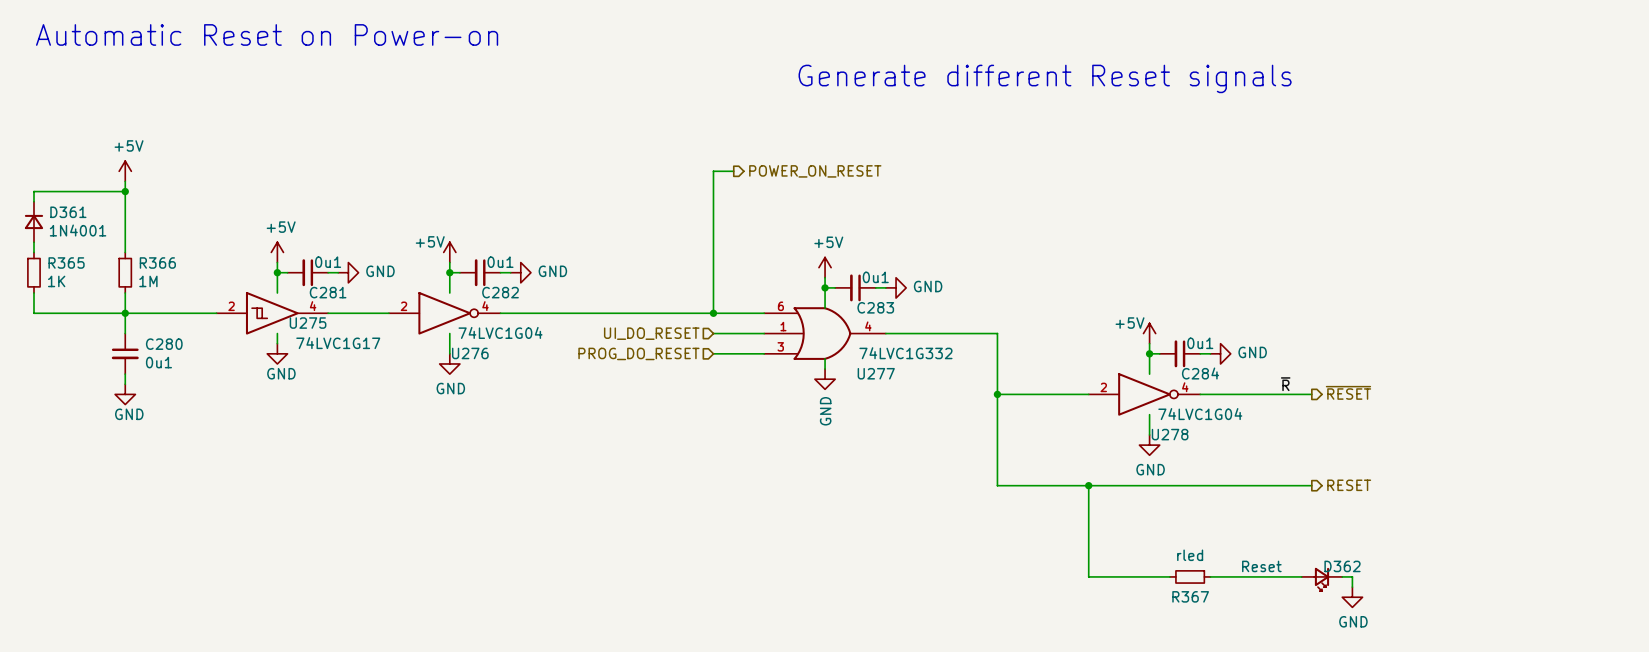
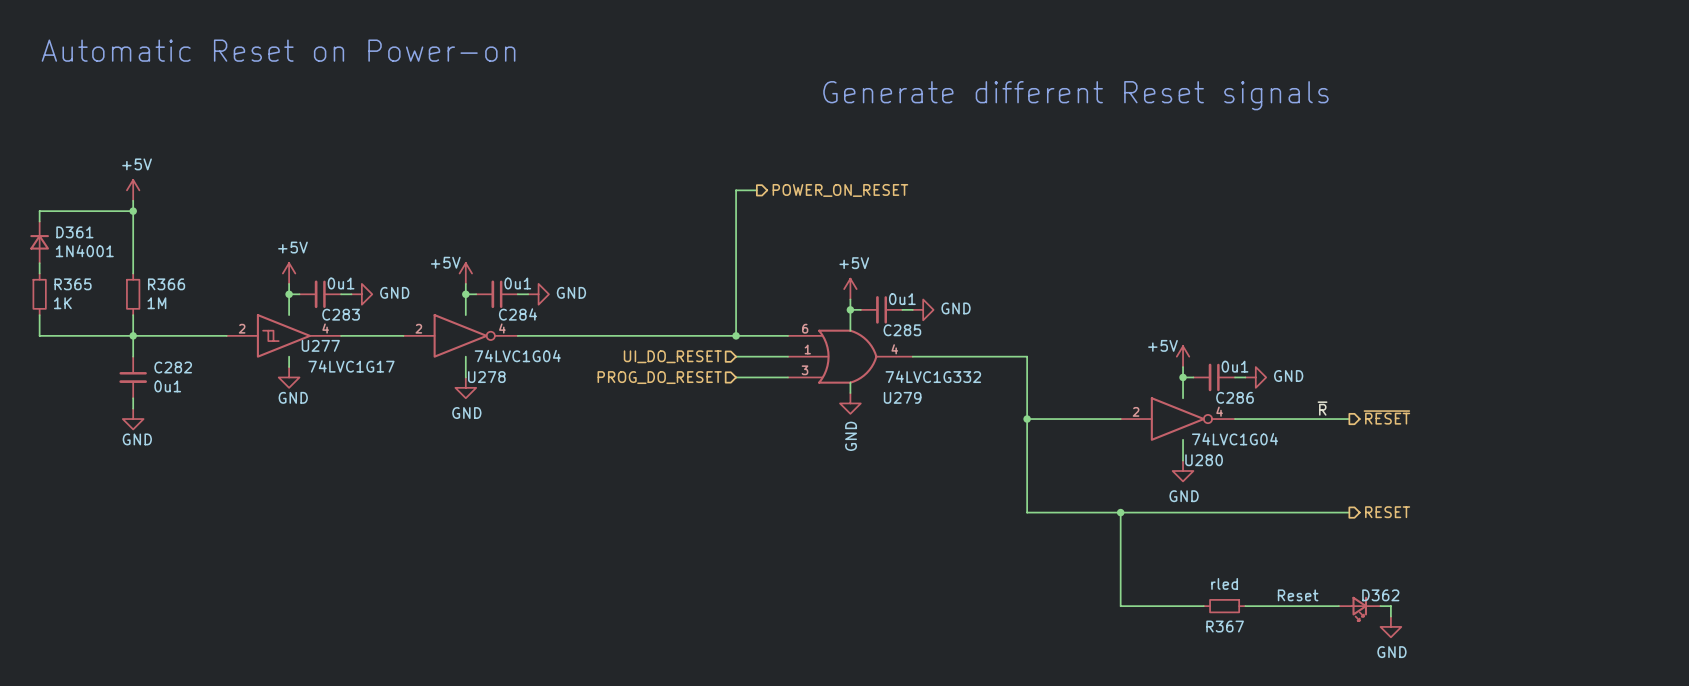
C281 name: C281 (328, 292) -> C283 (341, 314)
C282 name: C282 (500, 292) -> C284 (518, 314)
C283 name: C283 (875, 307) -> C285 (902, 330)
U275 name: U275 (308, 323) -> U277 (320, 345)
C280 name: C280 (164, 344) -> C282 (173, 367)
U276 name: U276 (470, 353) -> U278 (486, 377)
U277 name: U277 (876, 373) -> U279 (902, 397)
C284 name: C284 (1200, 373) -> C286 (1235, 397)
U278 name: U278 (1170, 434) -> U280 (1204, 460)

